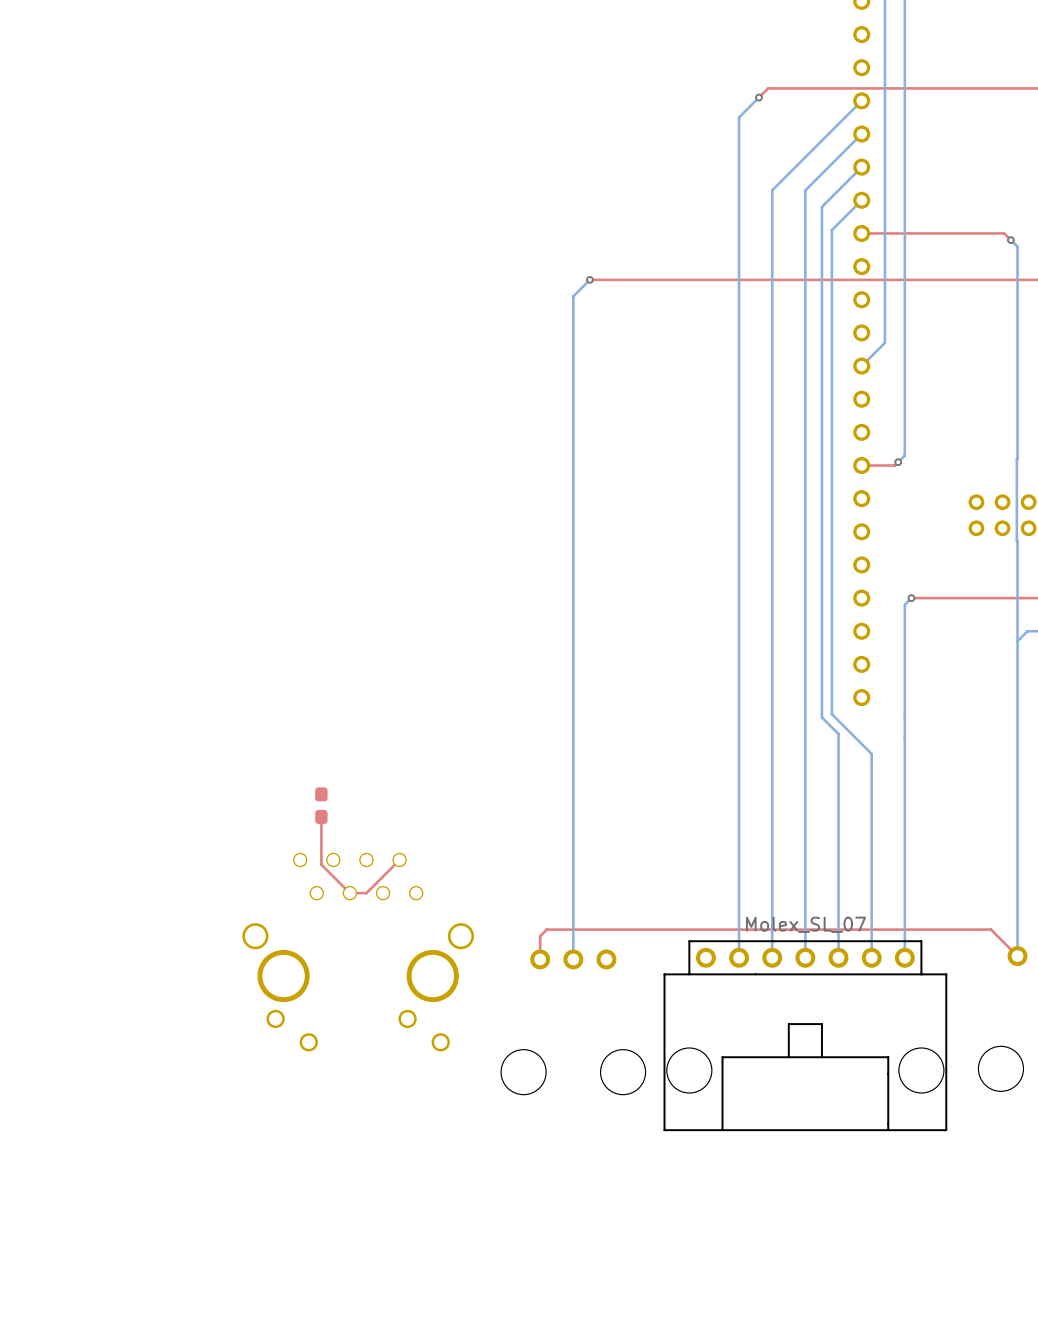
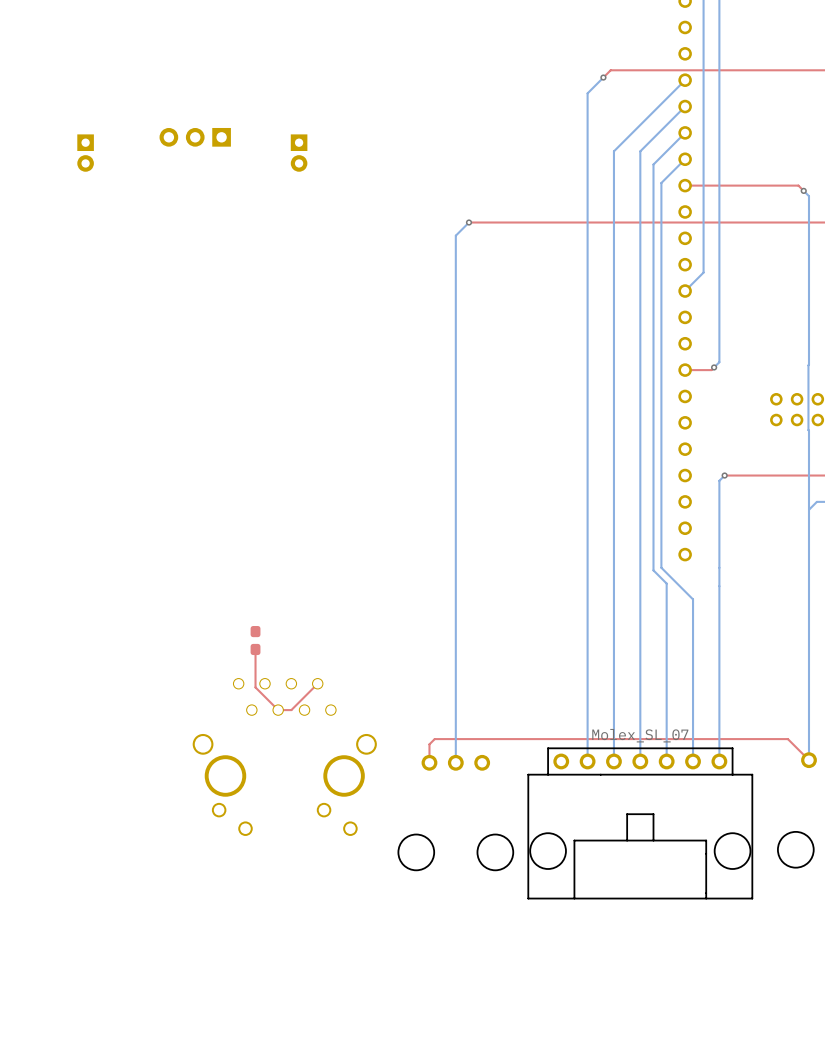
part: none -> (195, 137)
part: none -> (85, 153)
part: none -> (299, 153)

